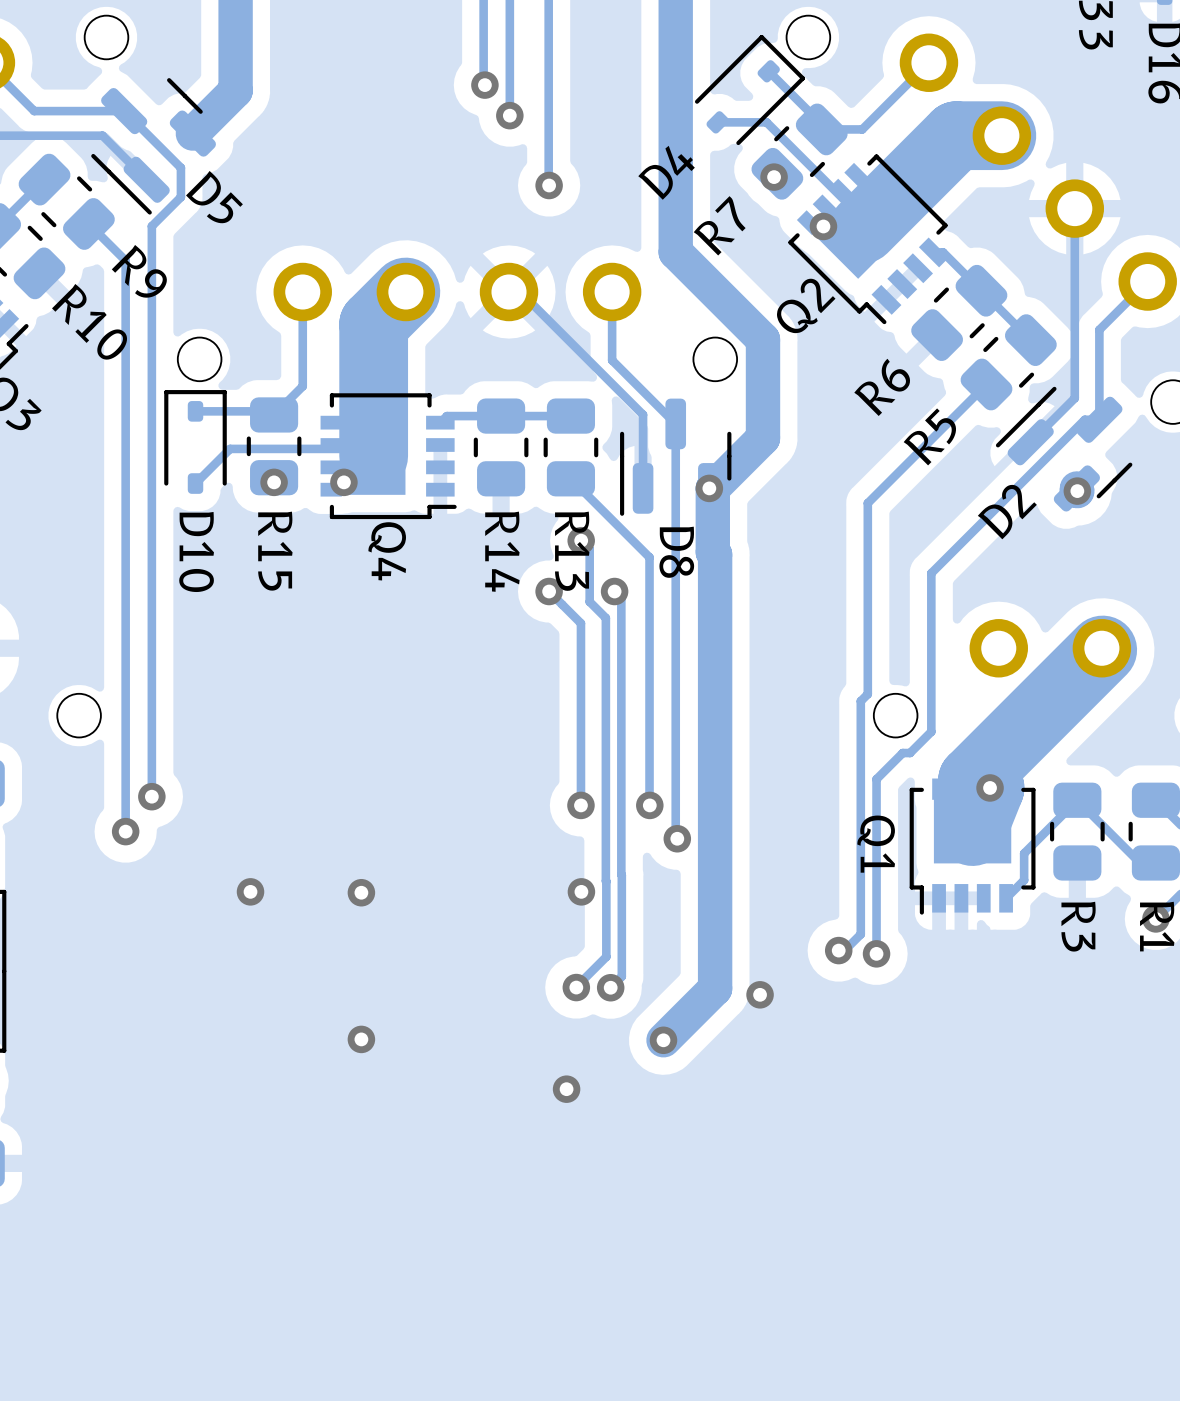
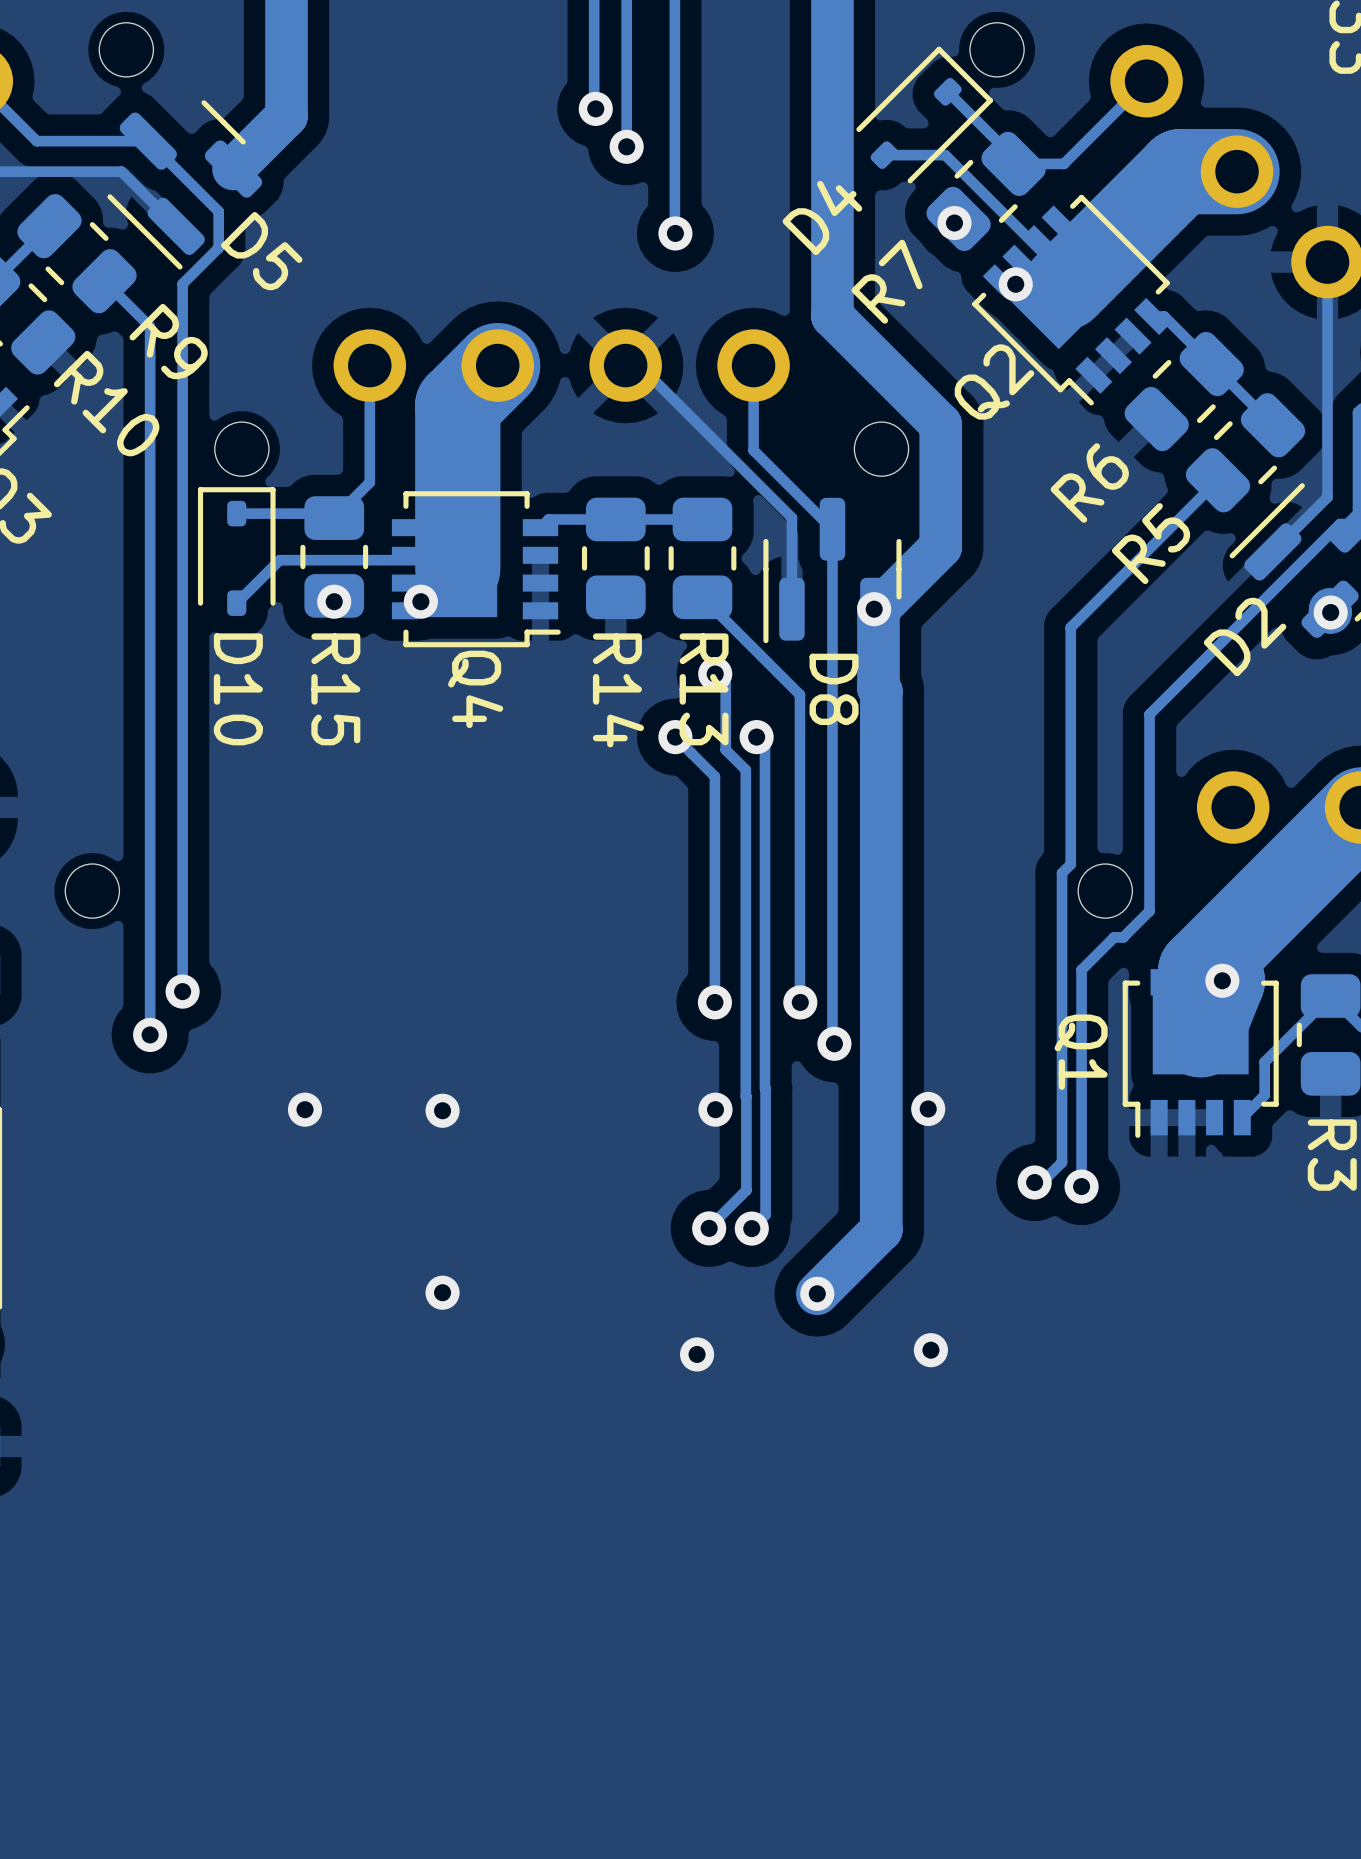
via: none -> (928, 1108)
via: (760, 994) -> none
via: none -> (930, 1350)

